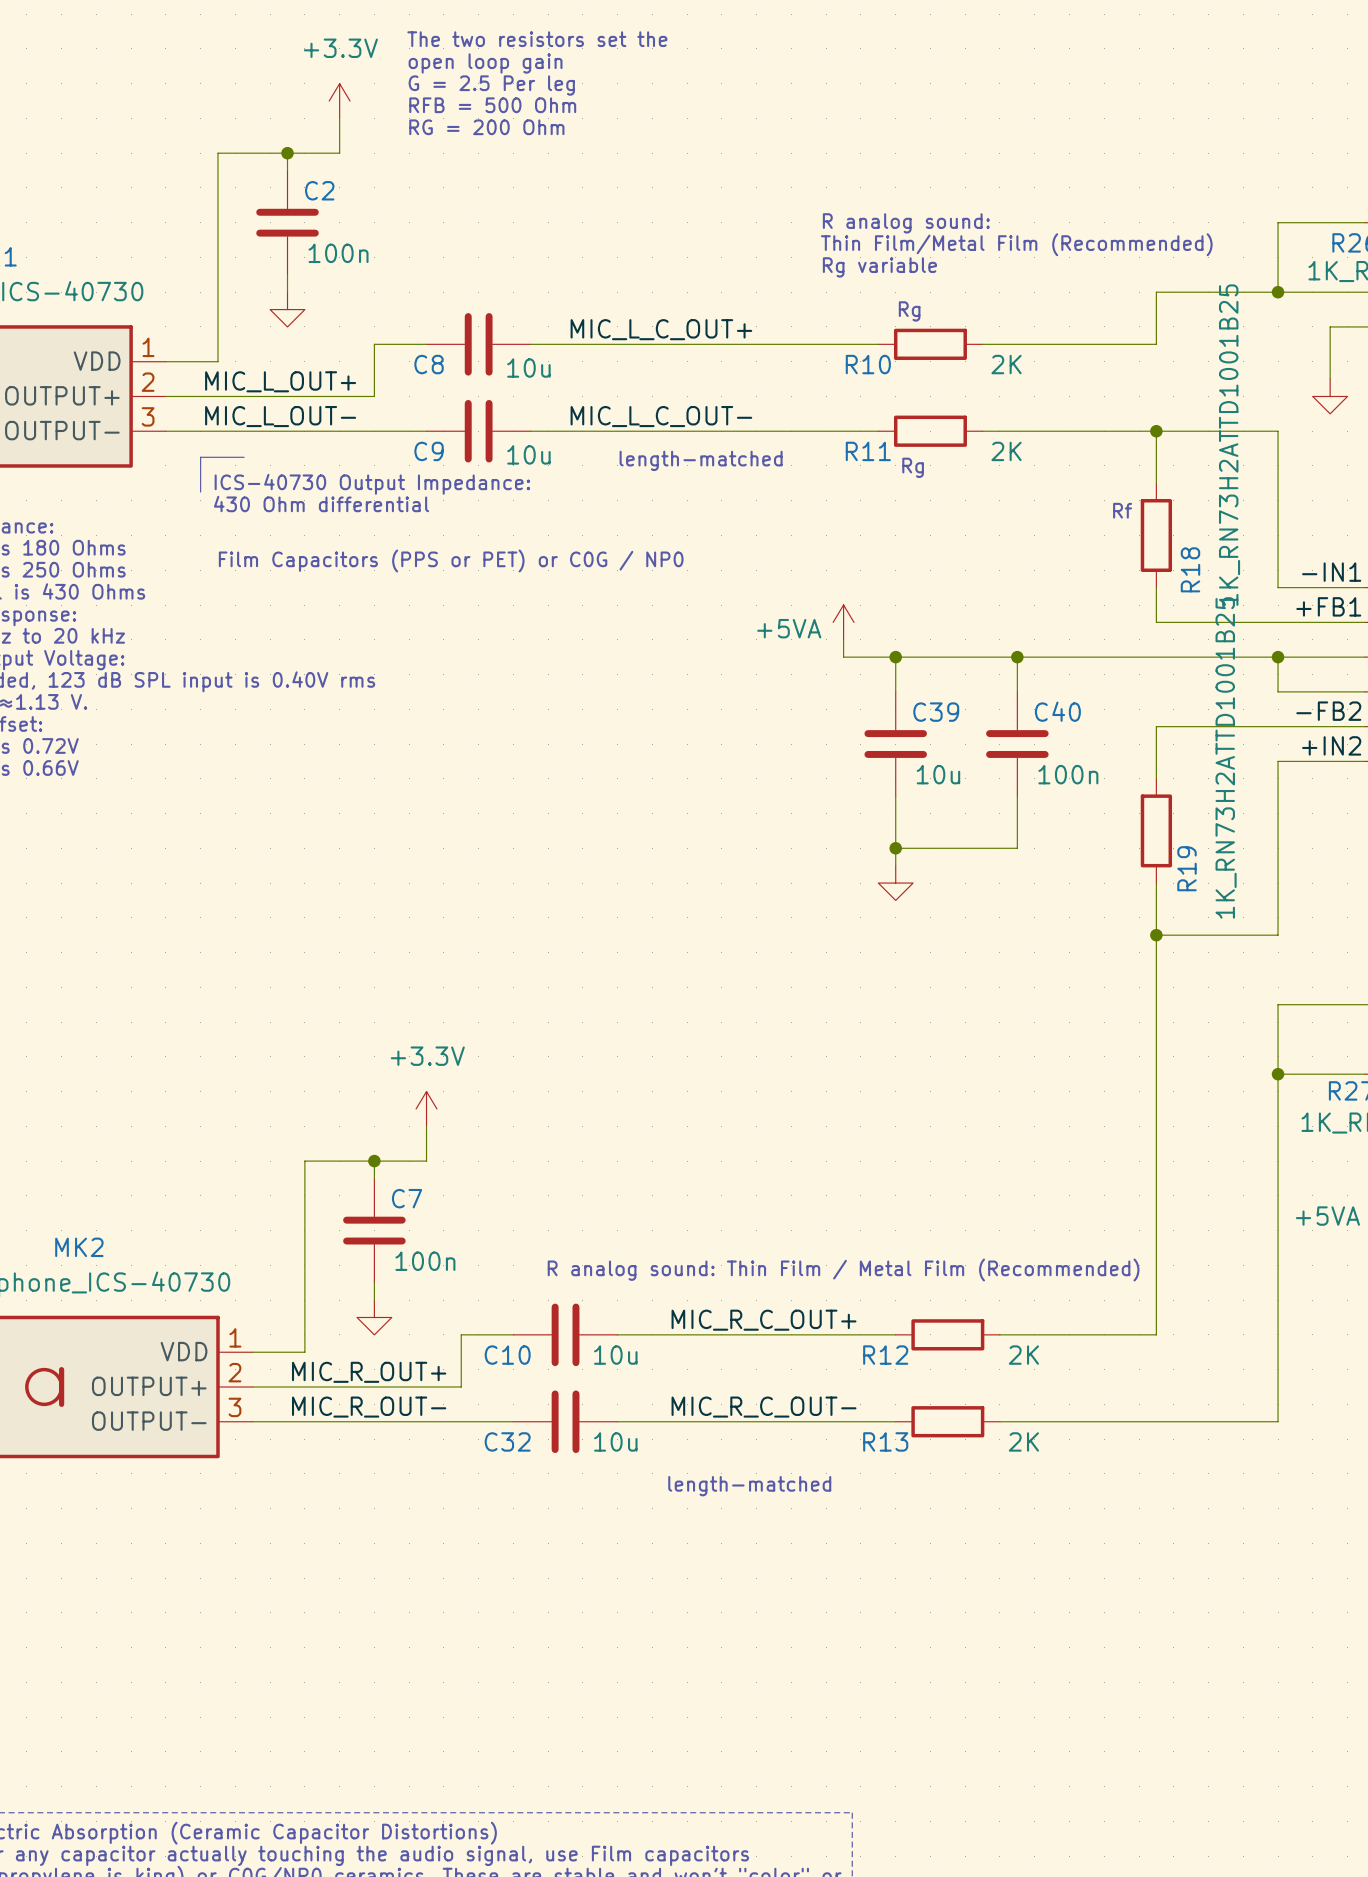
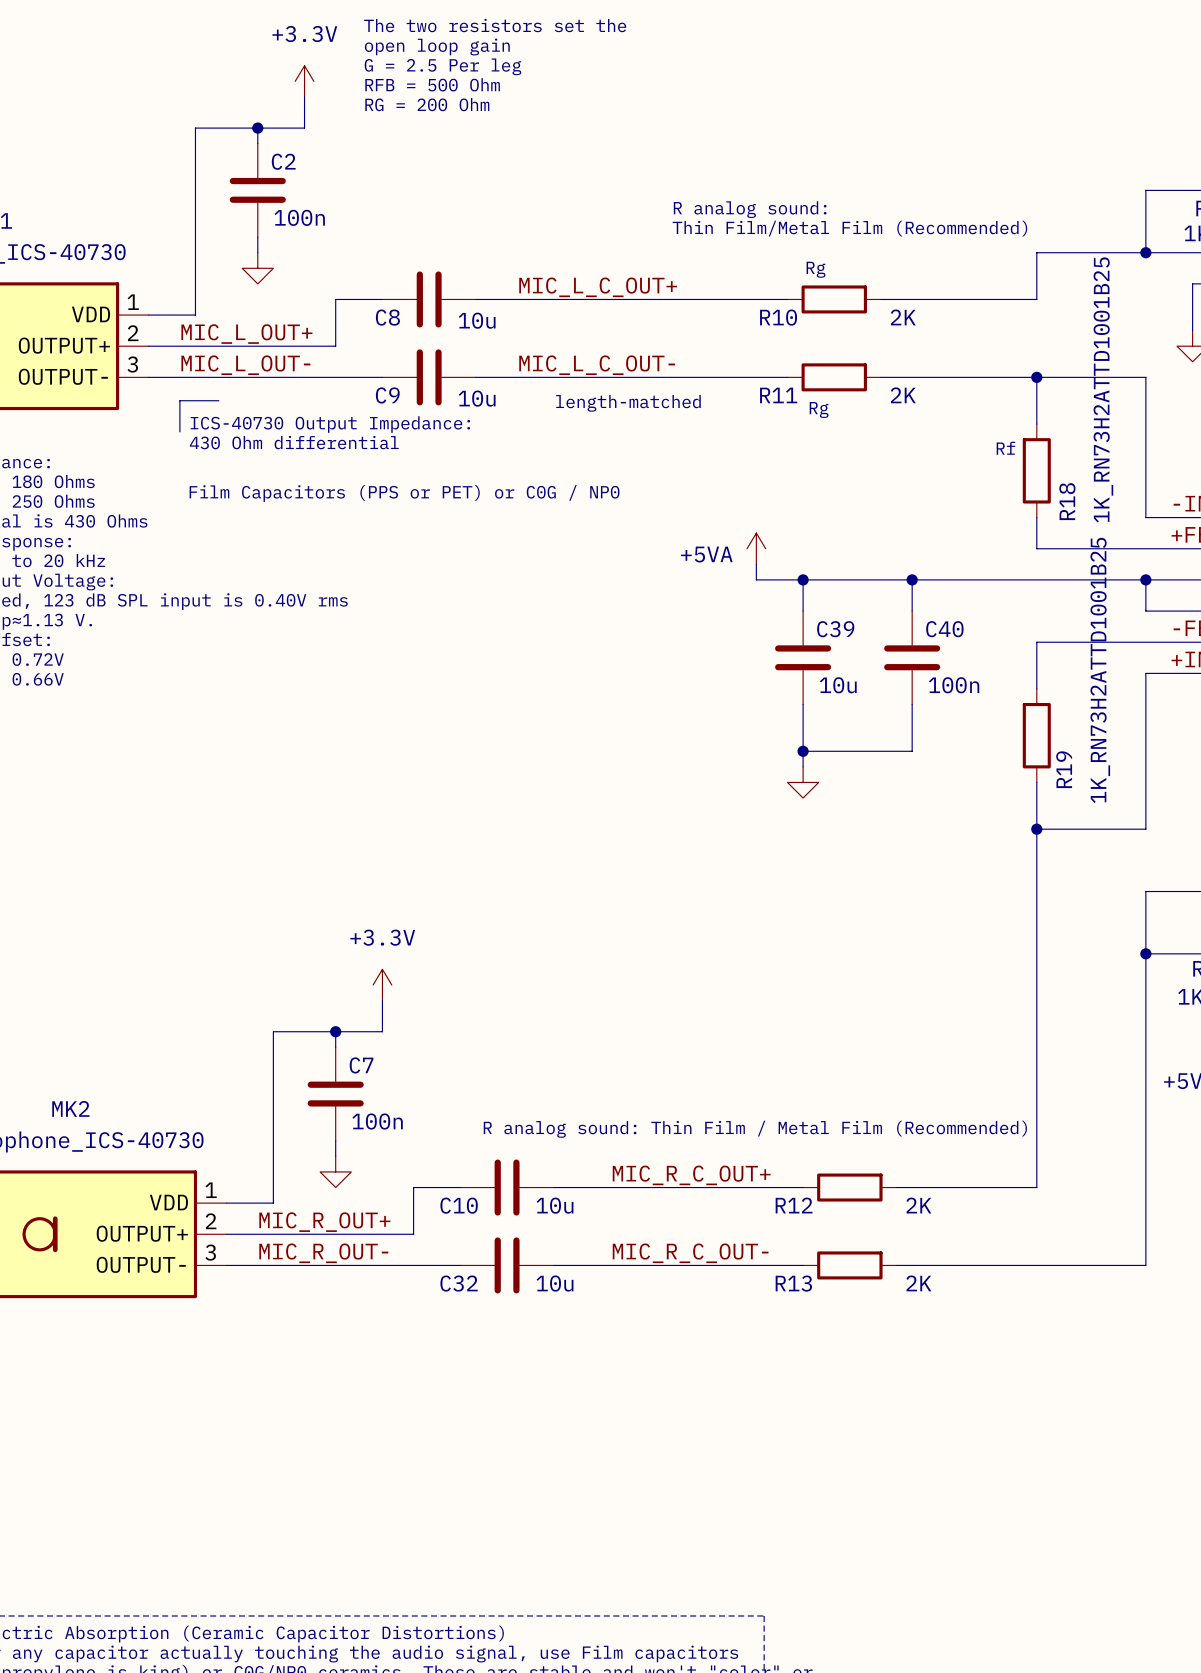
text position: R analog sound: (906, 223) -> R analog sound: (750, 209)
text position: Thin Film/Metal Film (Recommended) (1016, 244) -> Thin Film/Metal Film (Recommended) (849, 228)
text: Rg variable (879, 267) -> none
text: length-matched (749, 1486) -> none

